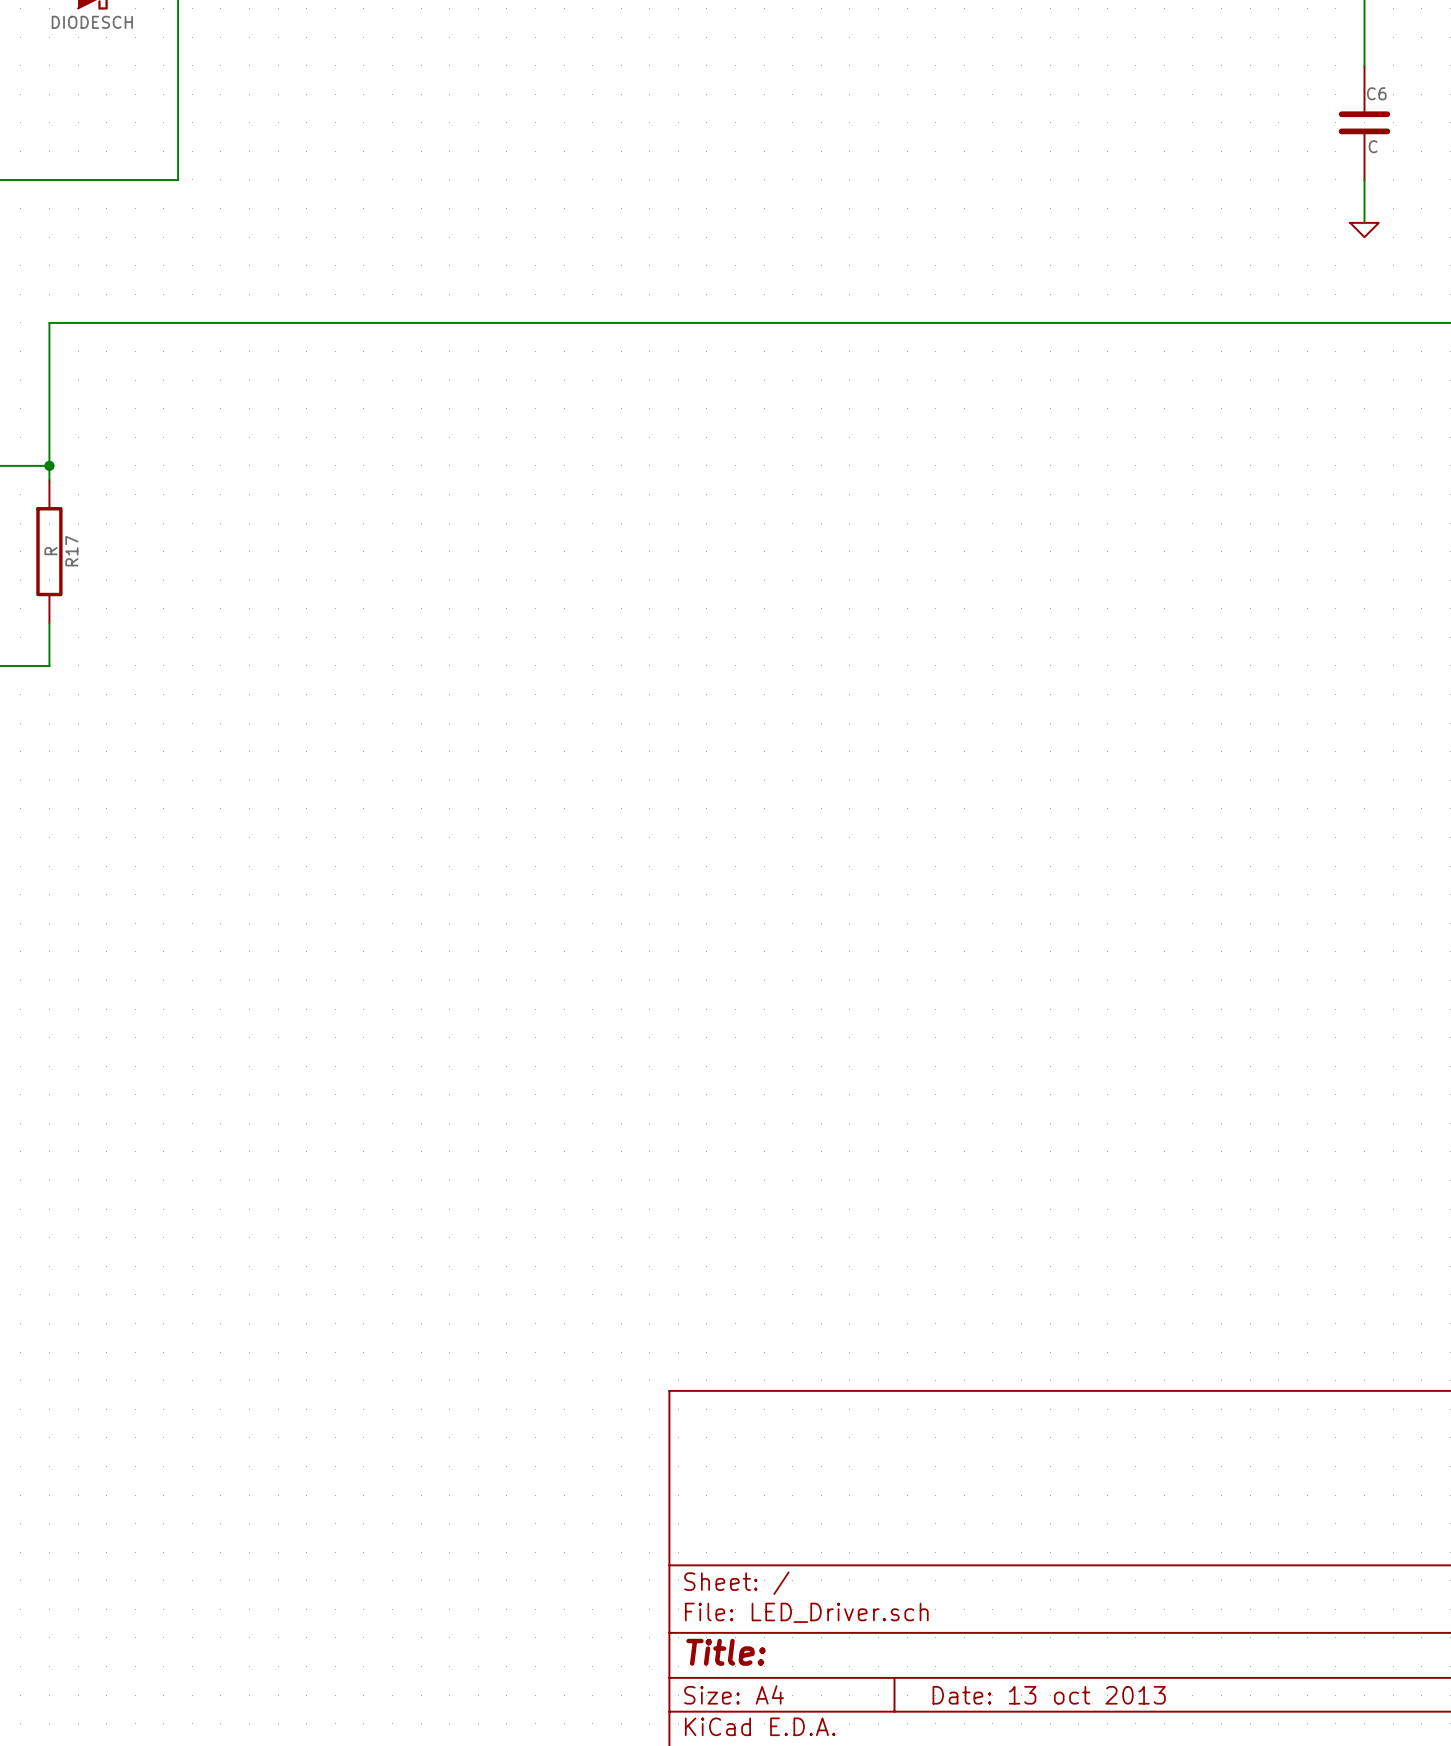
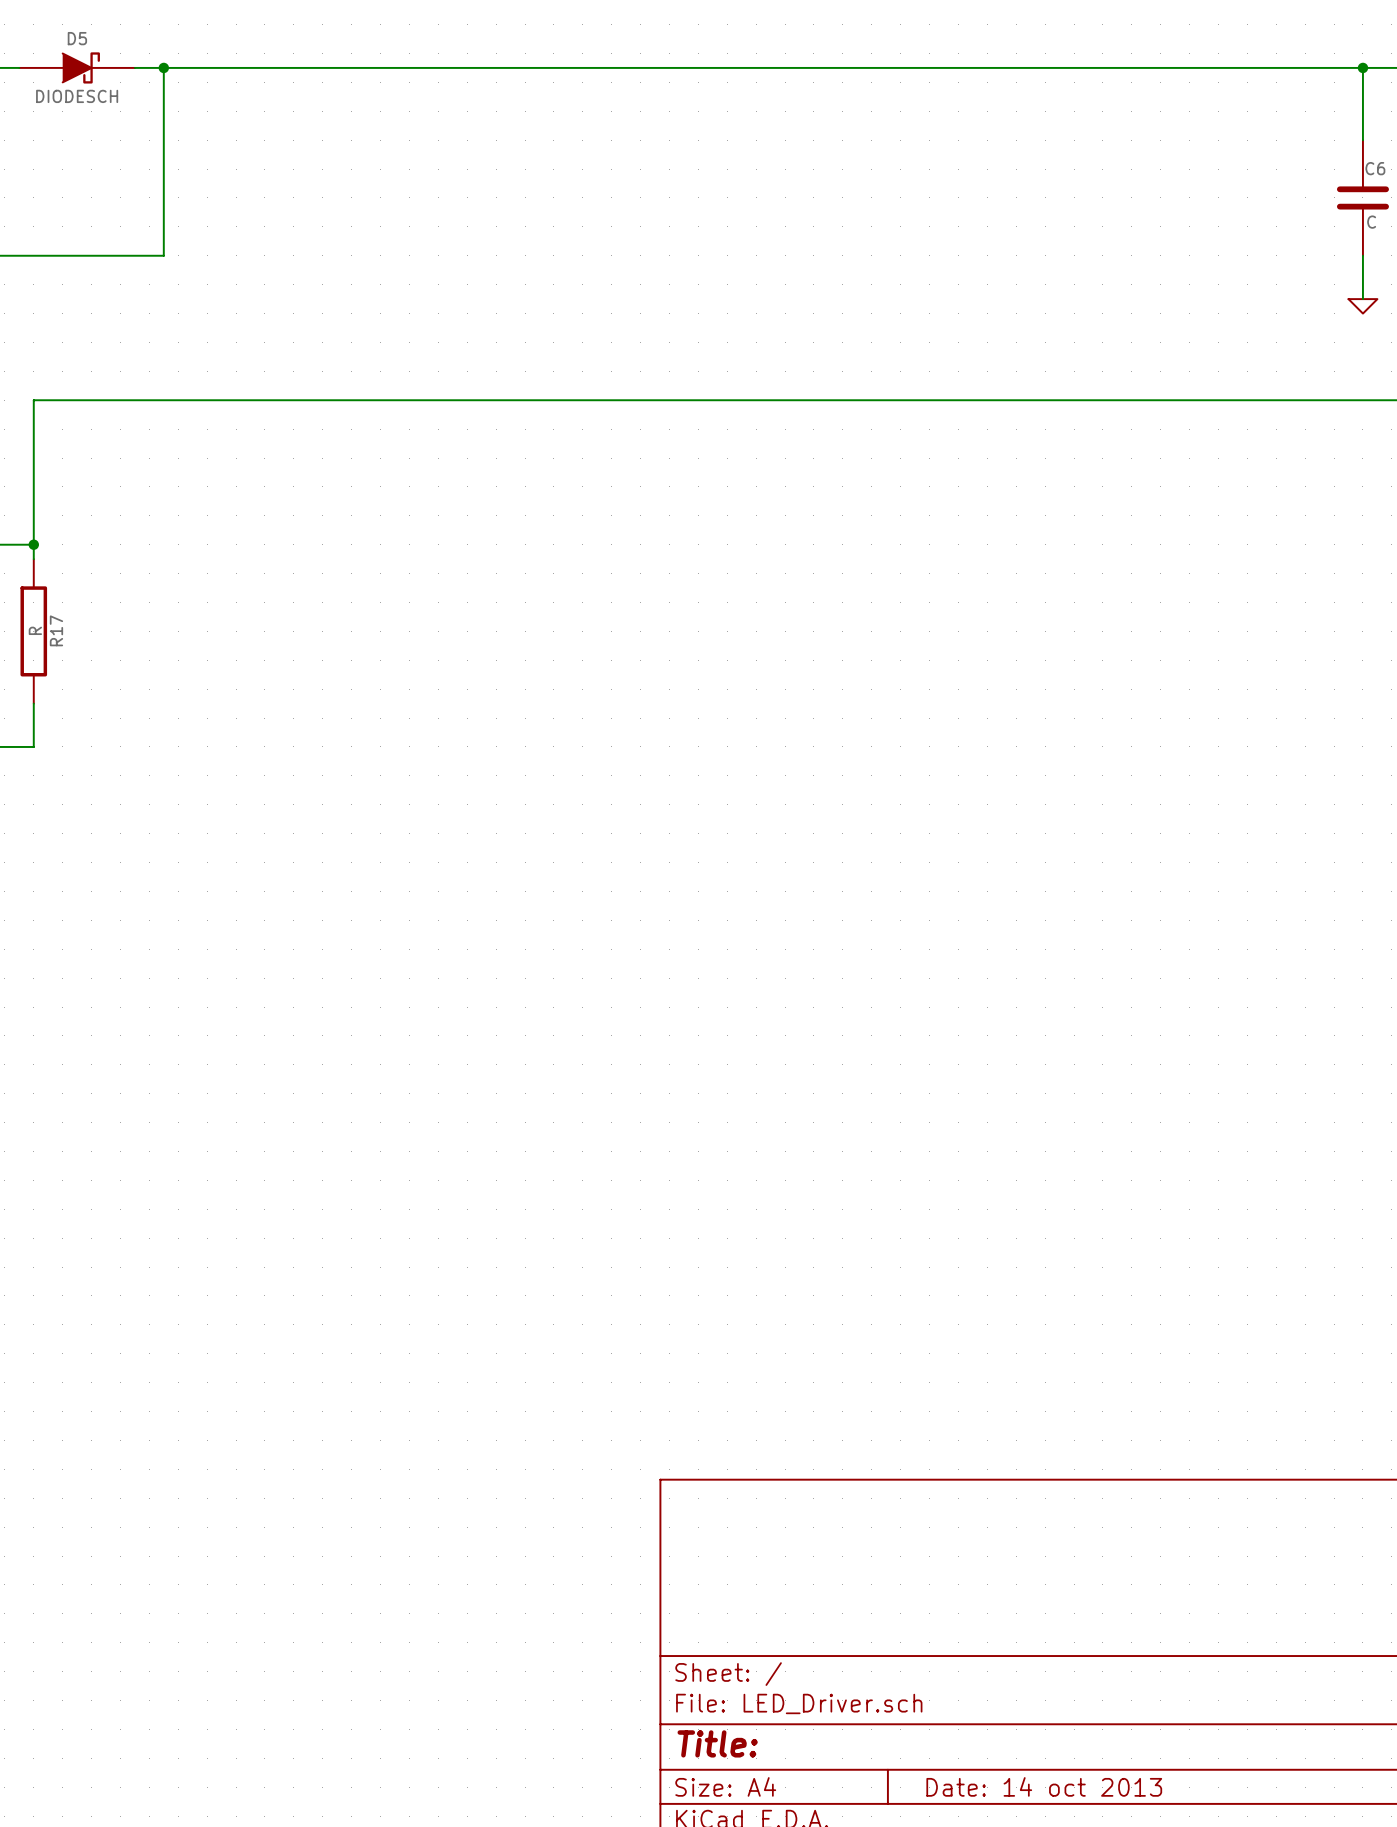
title block: Date: 13 oct 2013 (1049, 1695) -> Date: 14 oct 2013 (1044, 1786)

